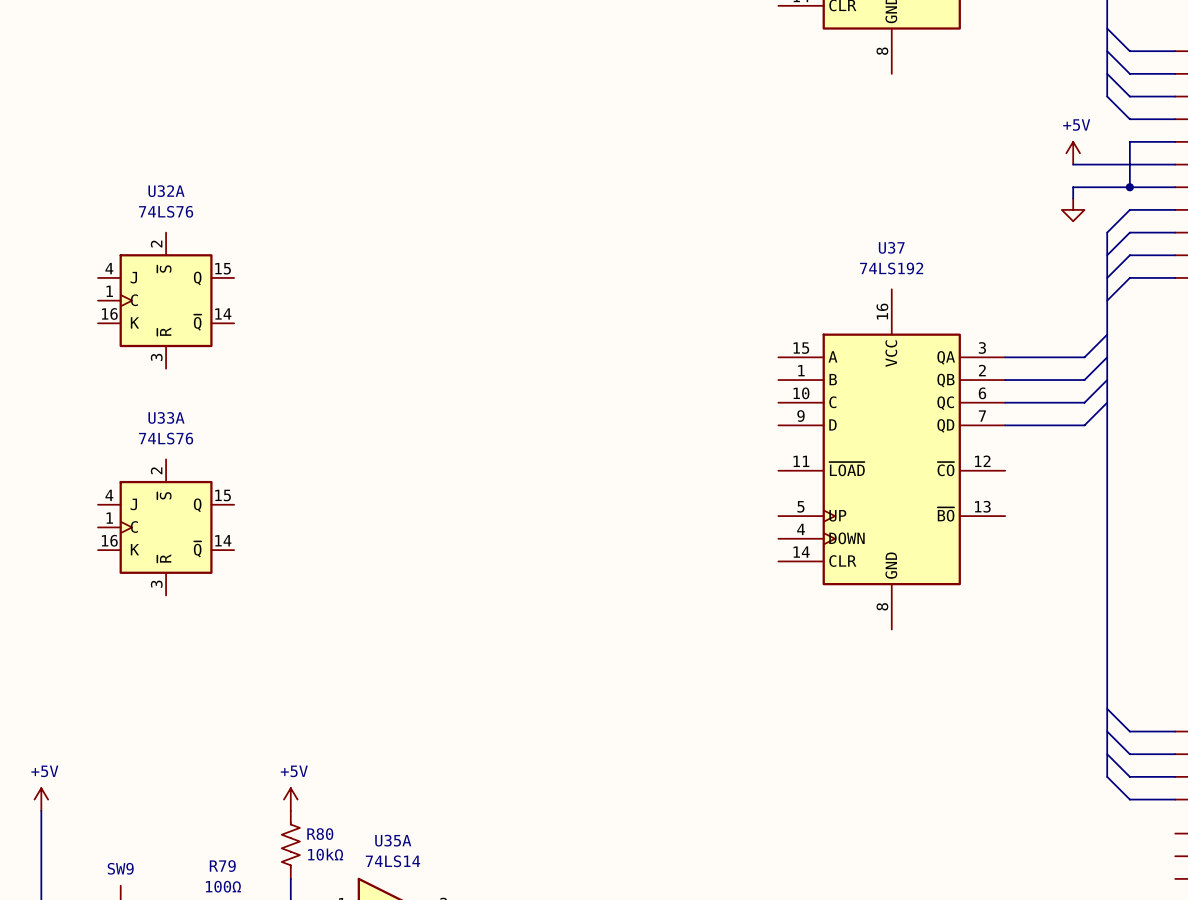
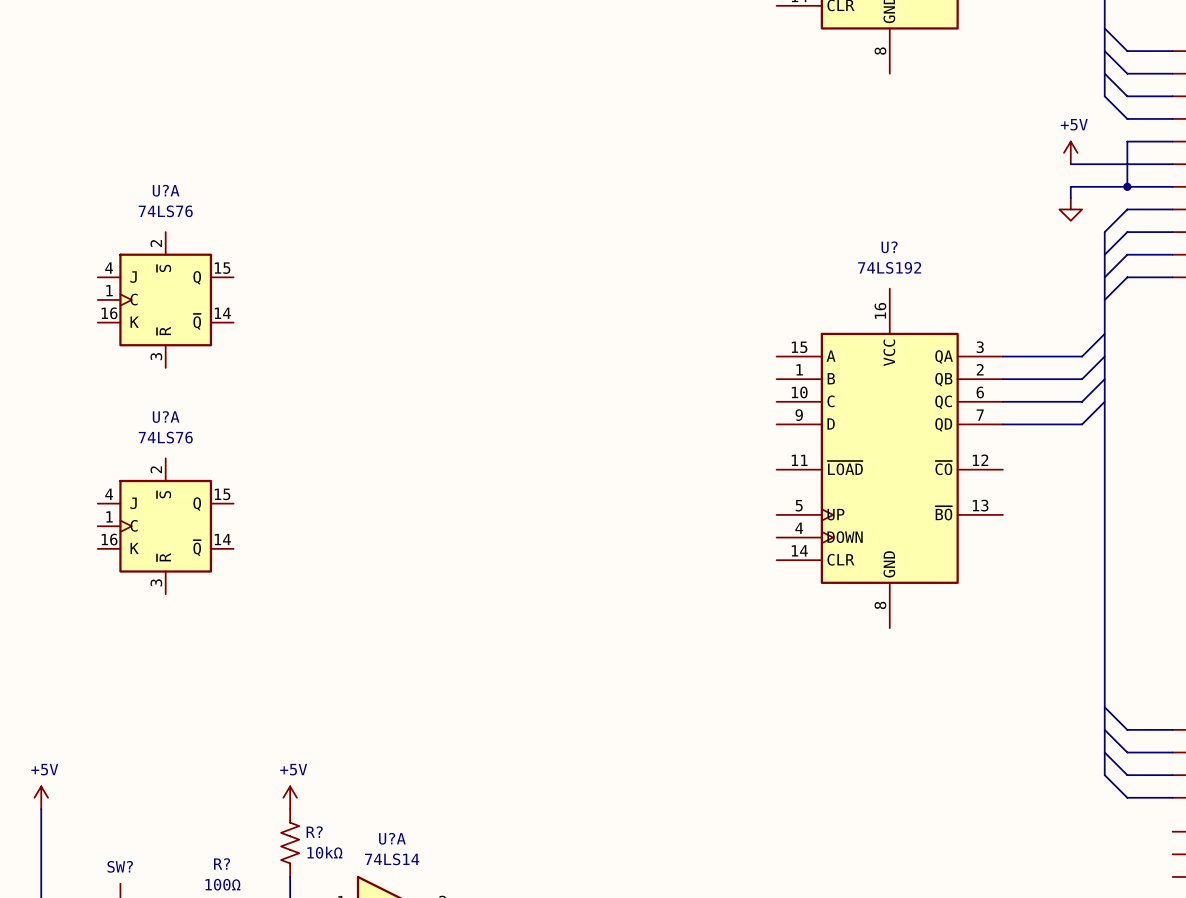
U32A name: U32A (166, 191) -> U?A (166, 190)
U37 name: U37 (891, 247) -> U? (889, 247)
U33A name: U33A (166, 417) -> U?A (166, 416)
R80 name: R80 (320, 834) -> R? (314, 832)
U35A name: U35A (393, 840) -> U?A (392, 838)
R79 name: R79 (222, 866) -> R? (222, 864)
SW9 name: SW9 (120, 868) -> SW? (120, 866)

